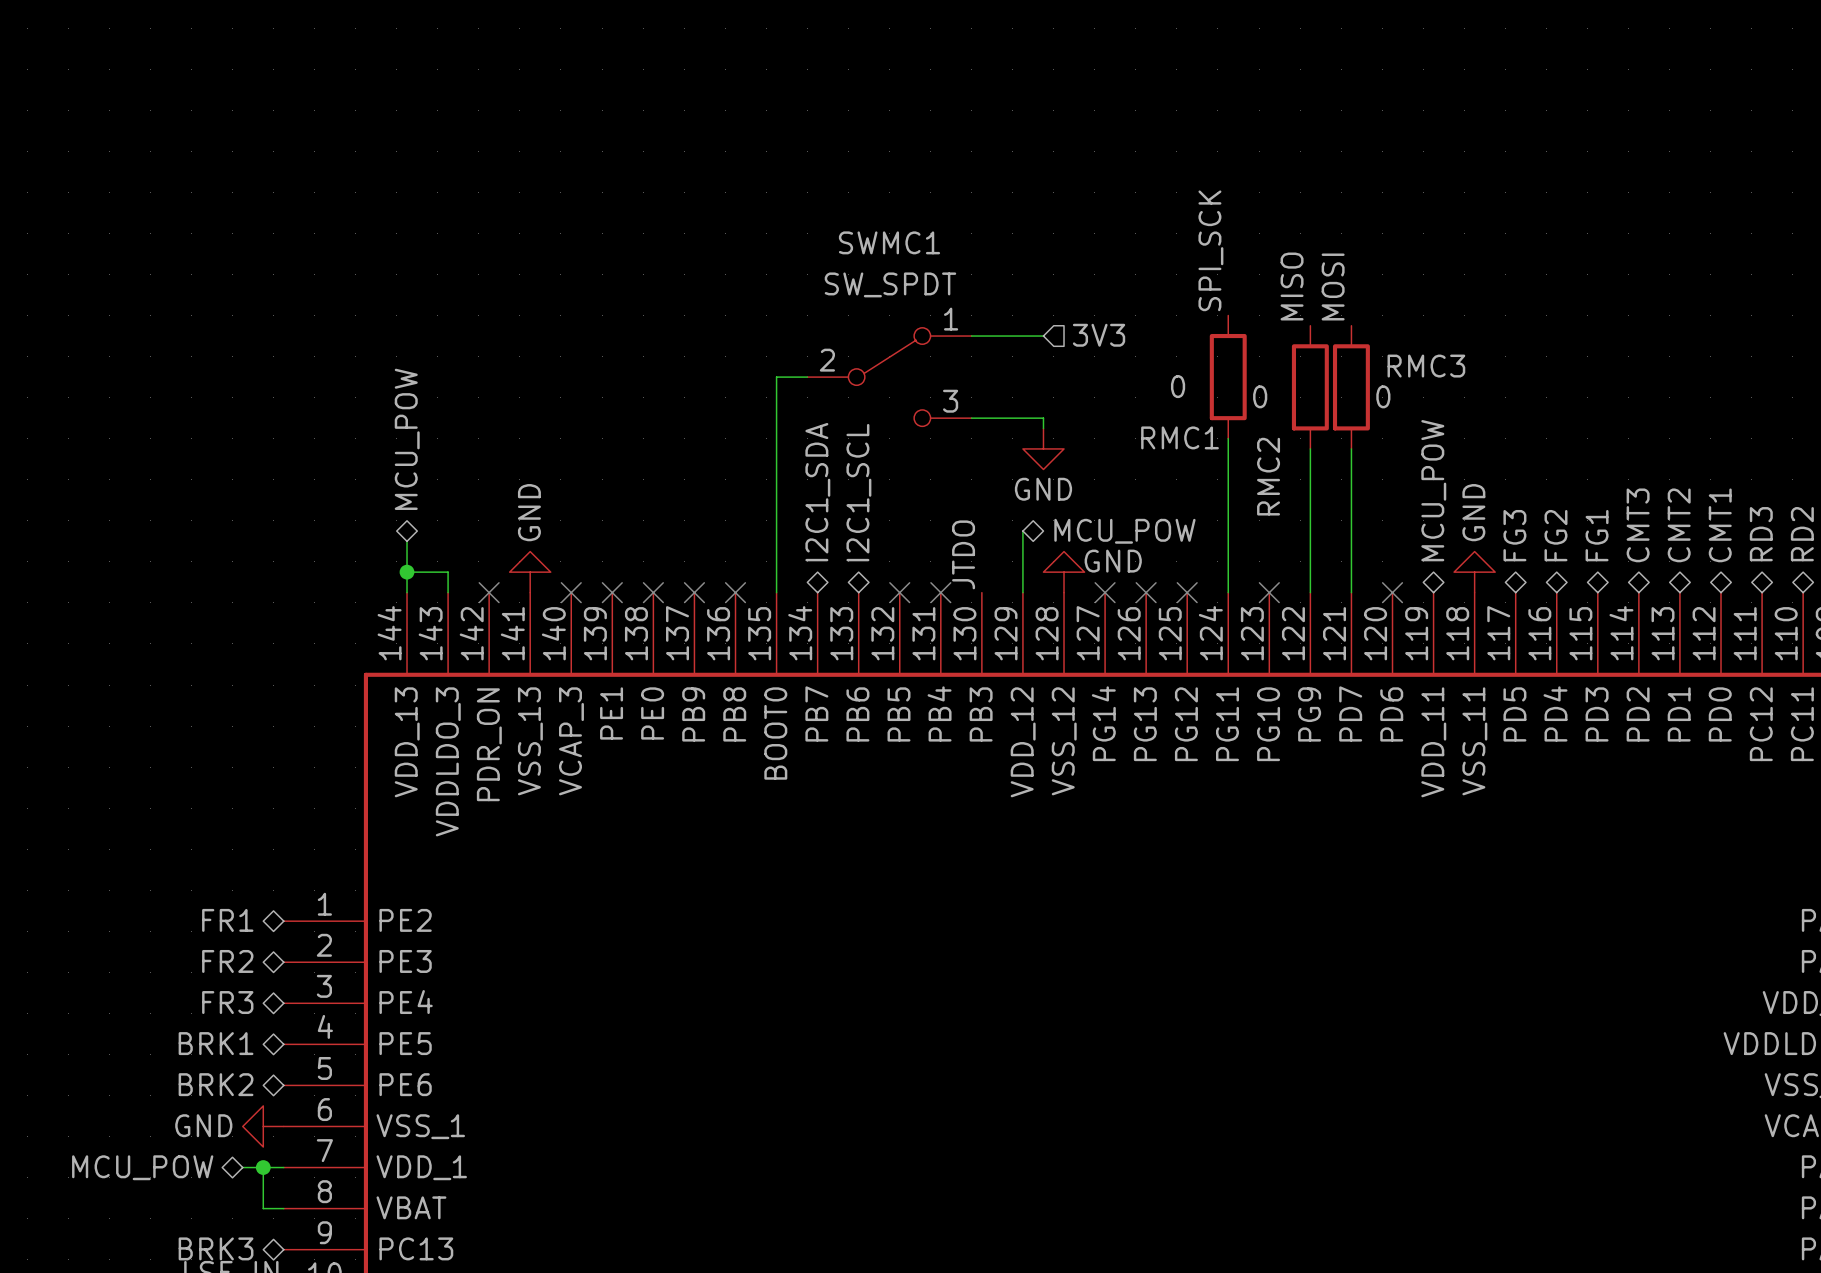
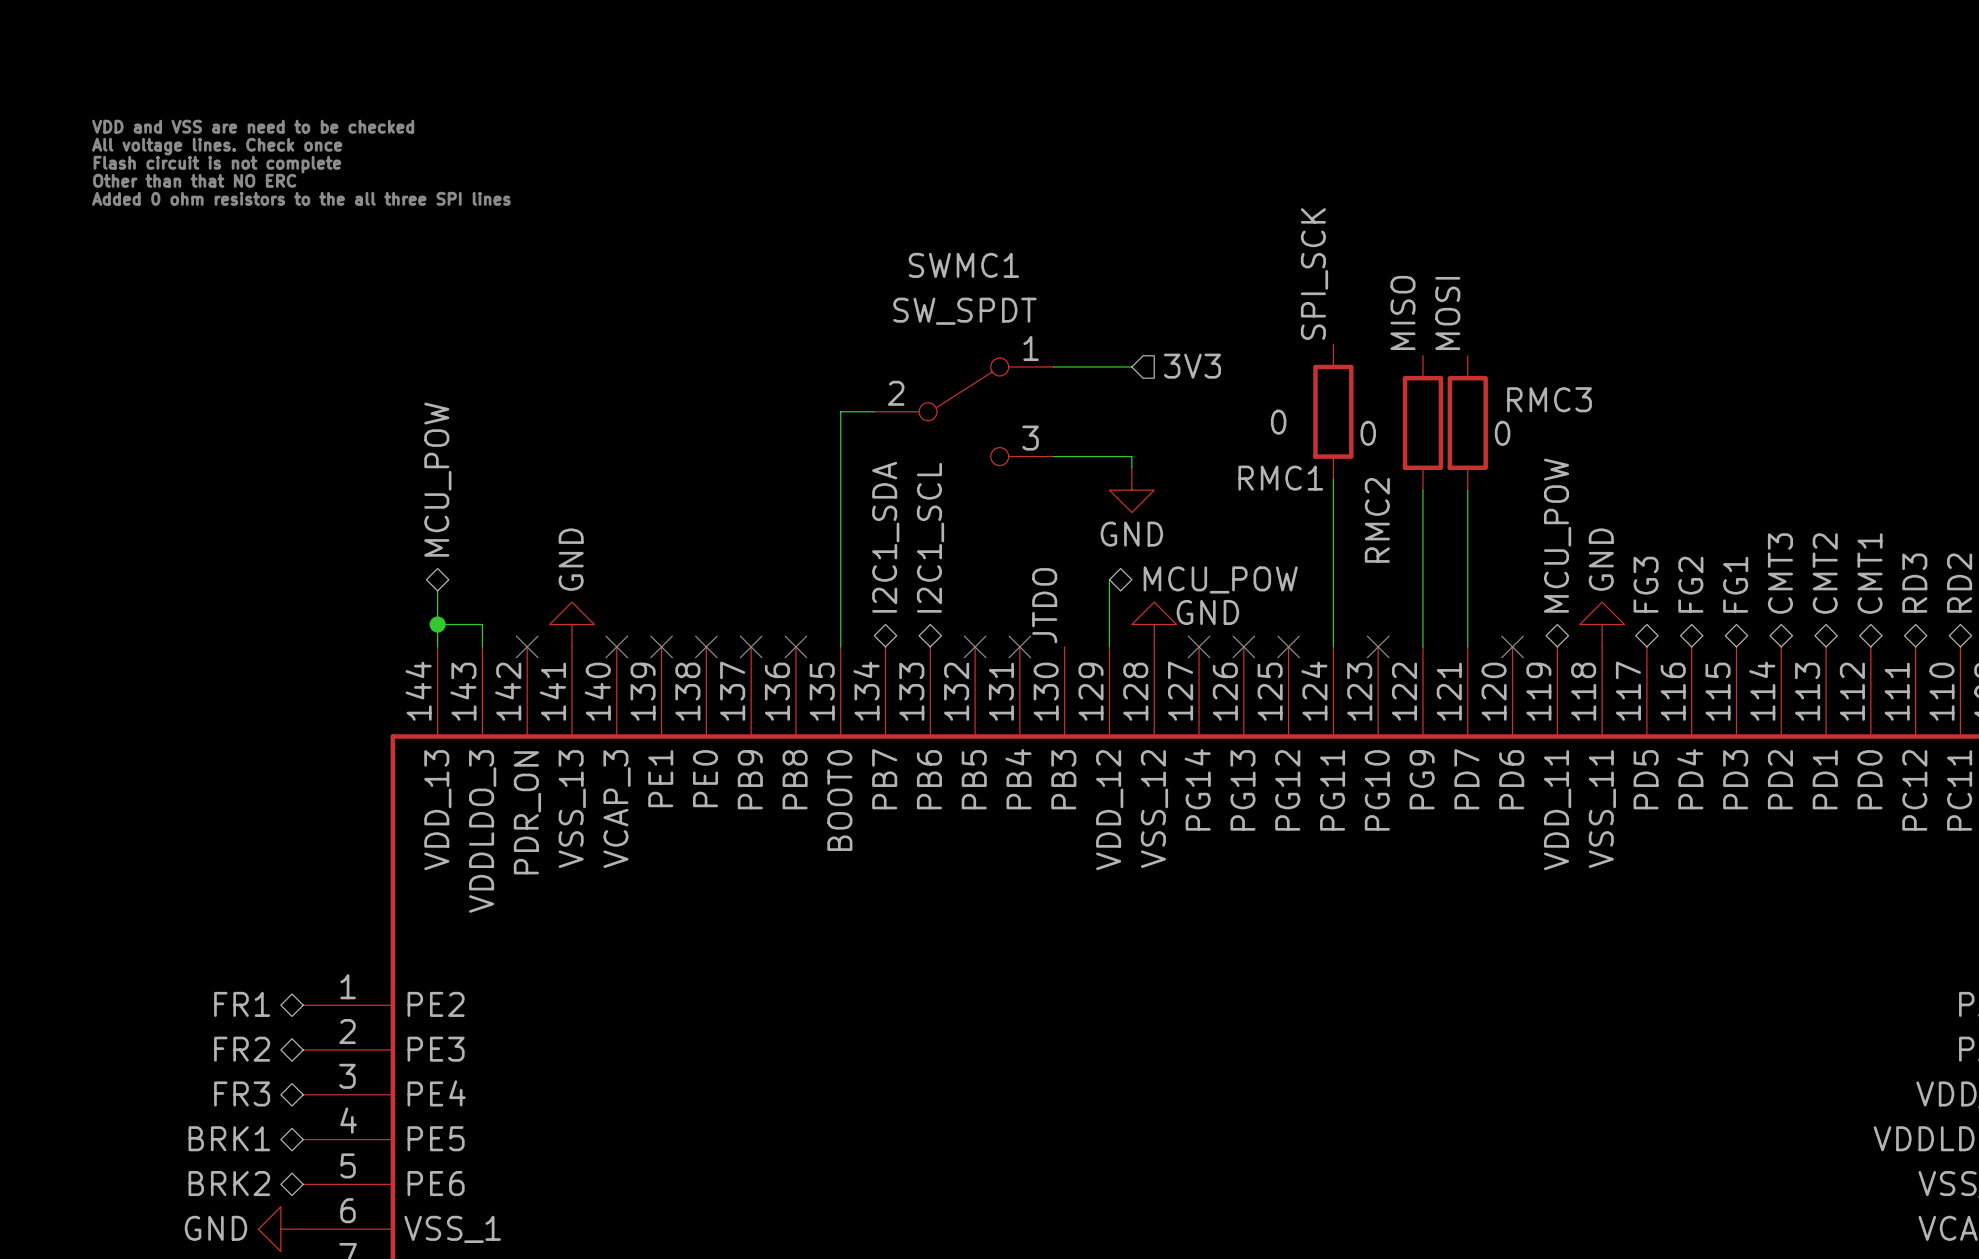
text: none -> VDD and VSS are need to be checked (253, 126)
text: none -> All voltage lines. Check once (217, 146)
text: none -> Flash circuit is not complete (217, 164)
text: none -> Other than that NO ERC (194, 180)
text: none -> Added 0 ohm resistors to the all three SPI lines (301, 198)

